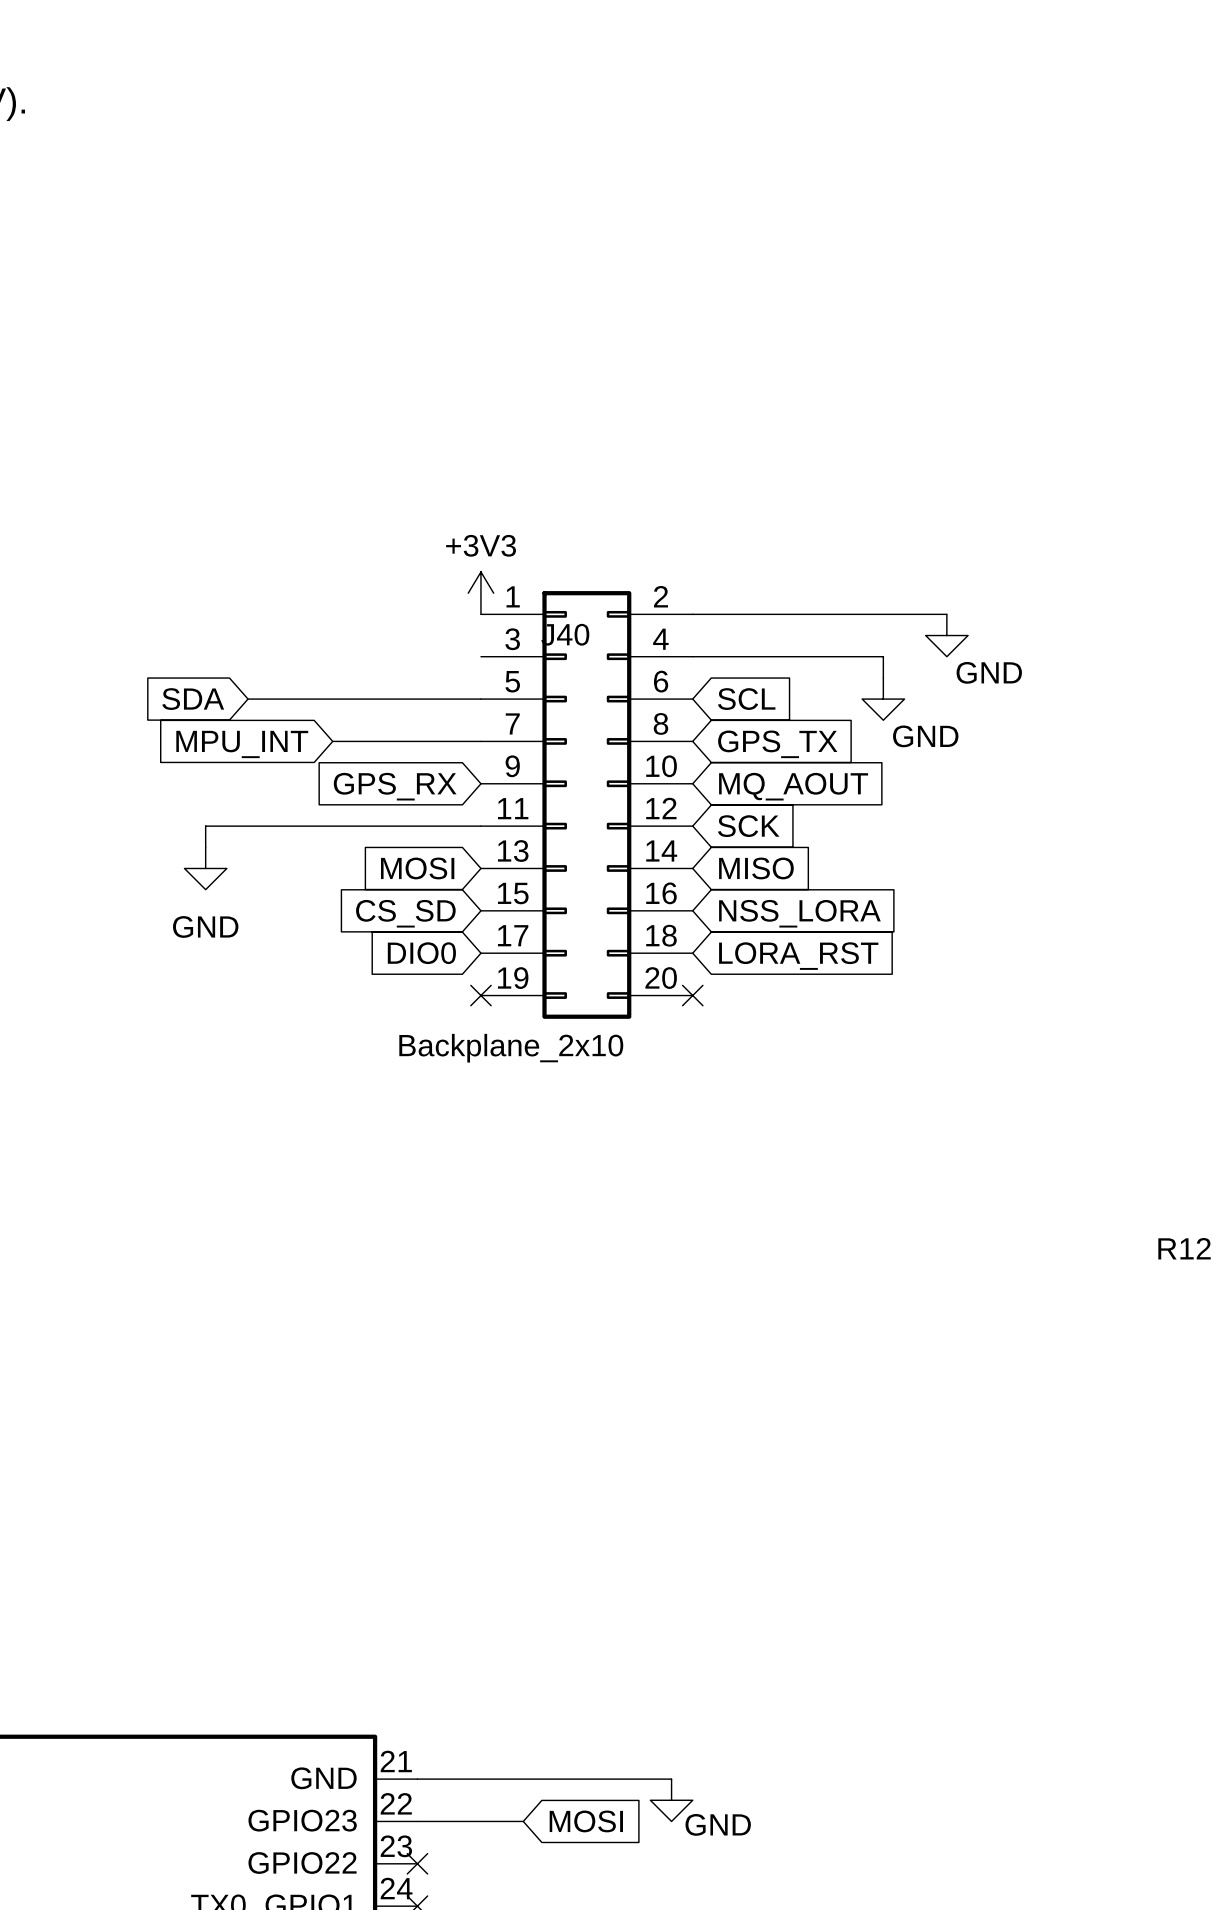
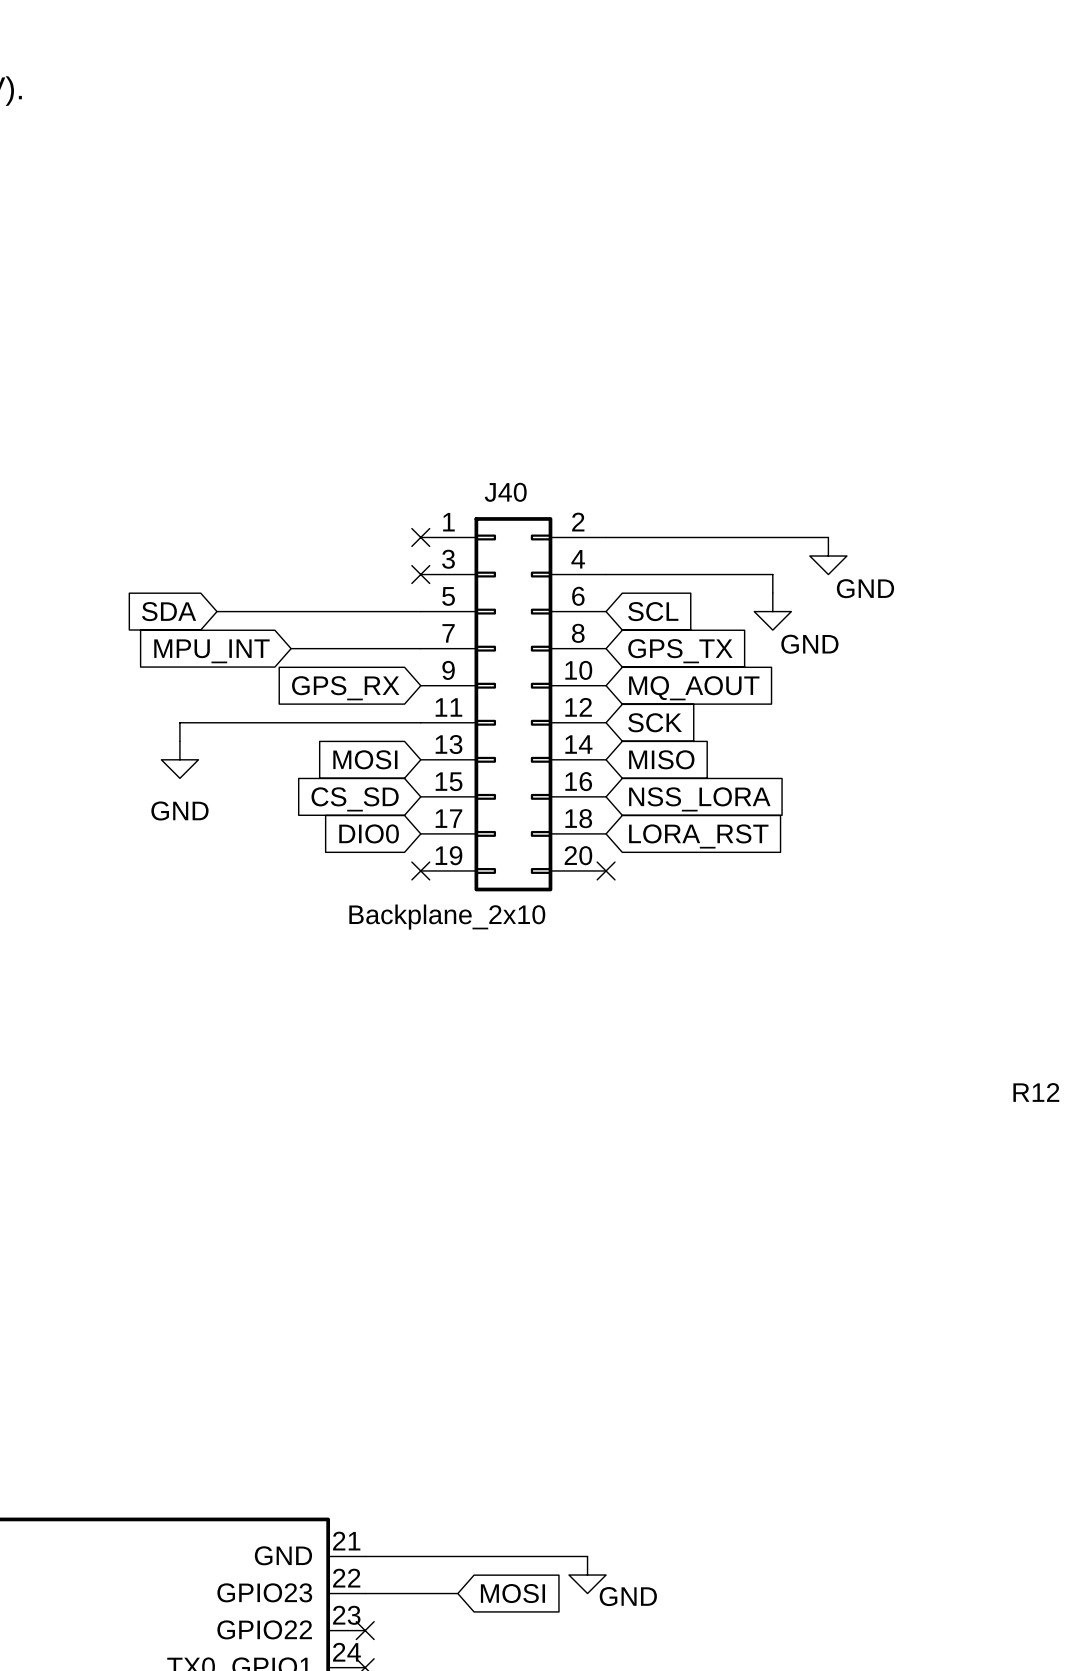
power symbol: +3V3 (480, 593) -> none
no-connect mark: none -> (420, 537)
J40 name position: J40 (565, 634) -> J40 (505, 492)
no-connect mark: none -> (420, 574)

